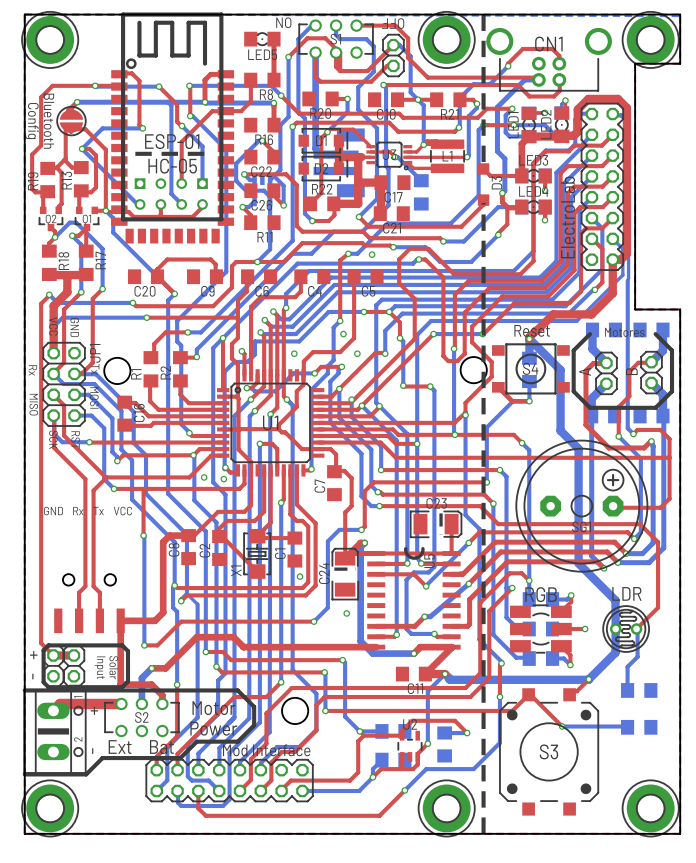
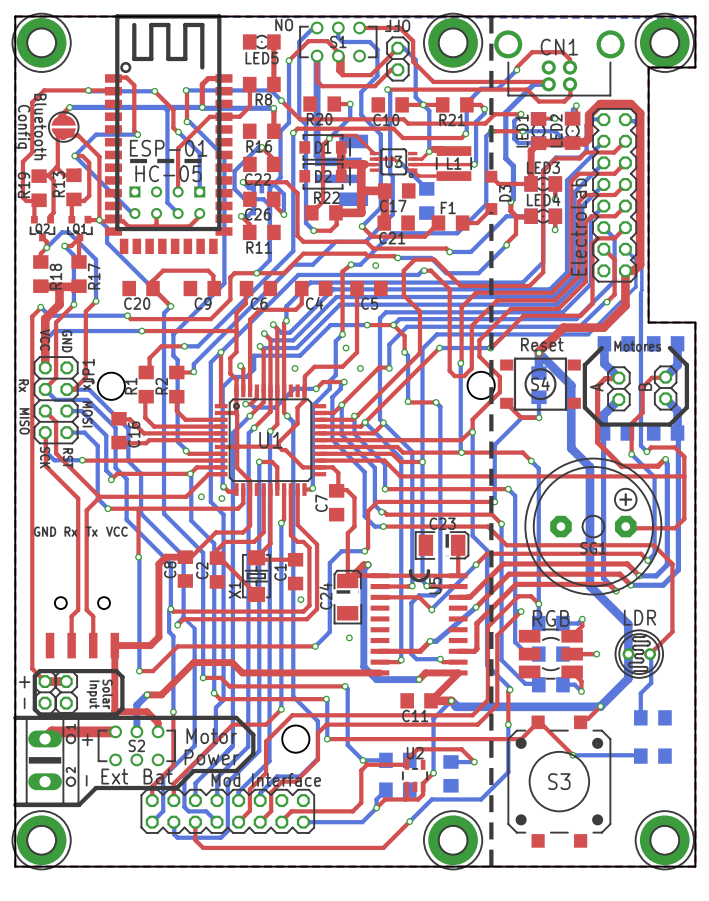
top track: (483, 200) (483, 204) (461, 226) (419, 226) -> (491, 209) (477, 223) (462, 223)
top track: none -> (438, 223) (424, 236)
F1: none -> (450, 223)

